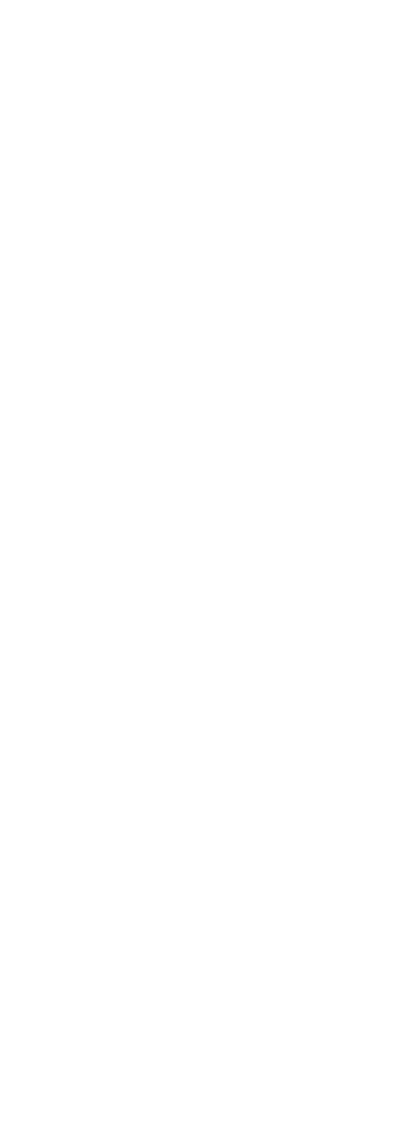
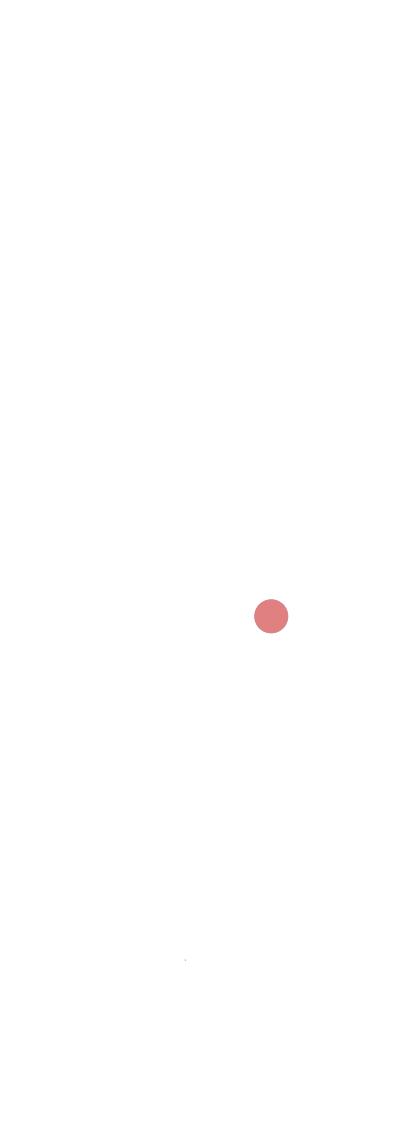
part: none -> (271, 616)

